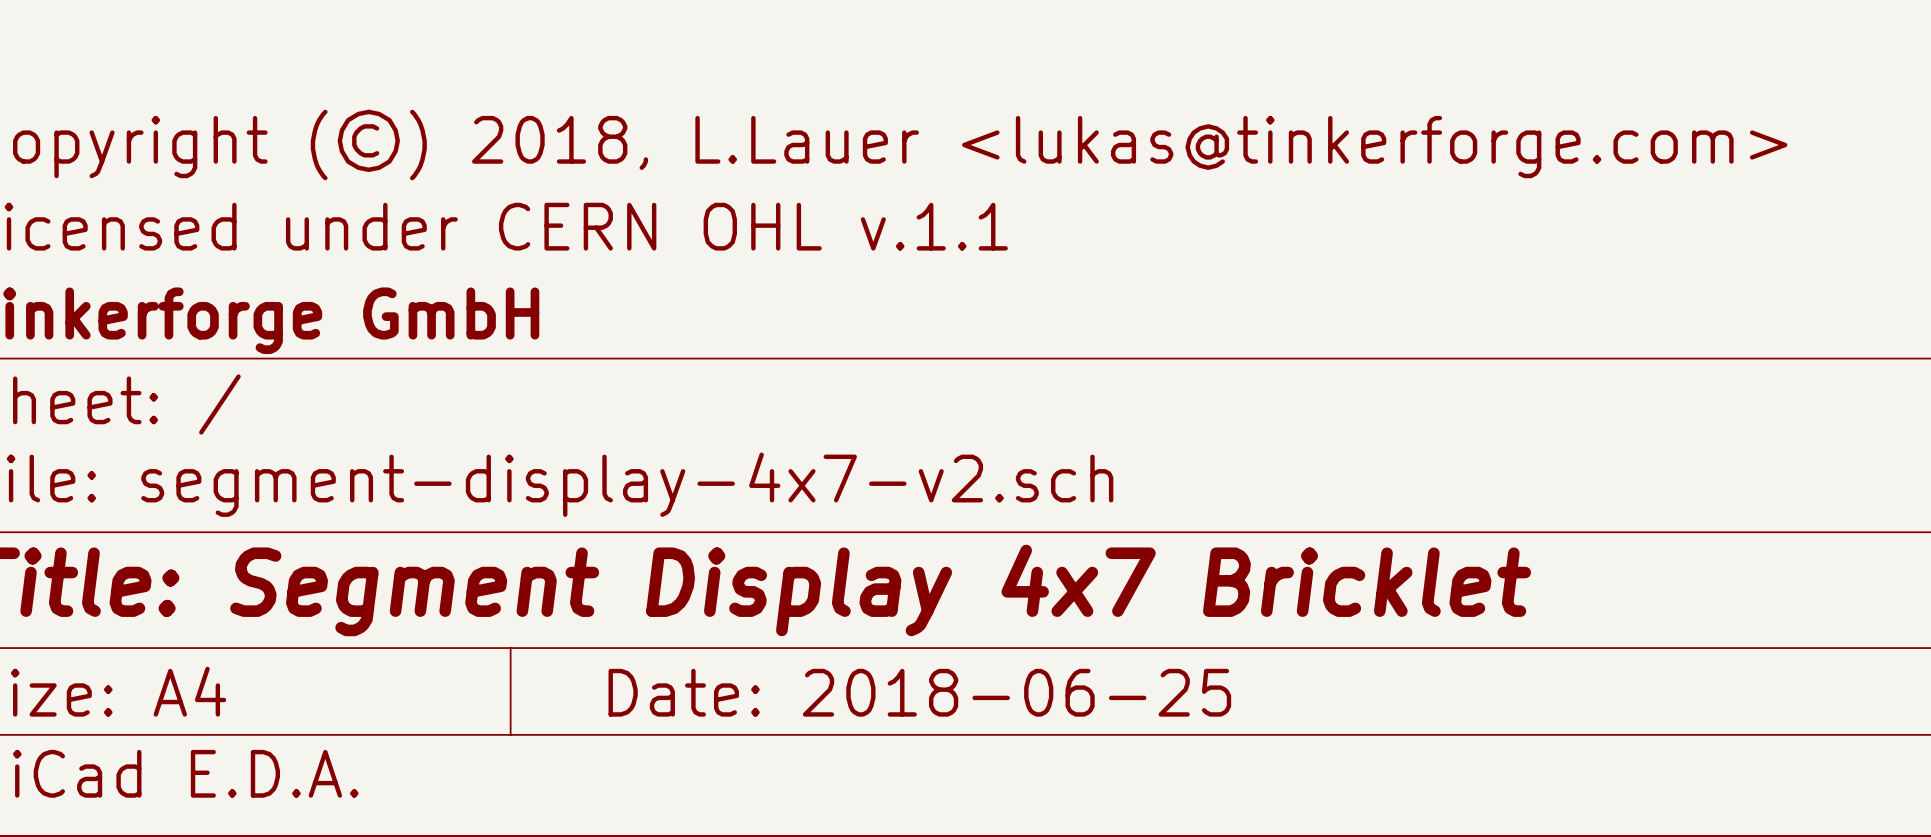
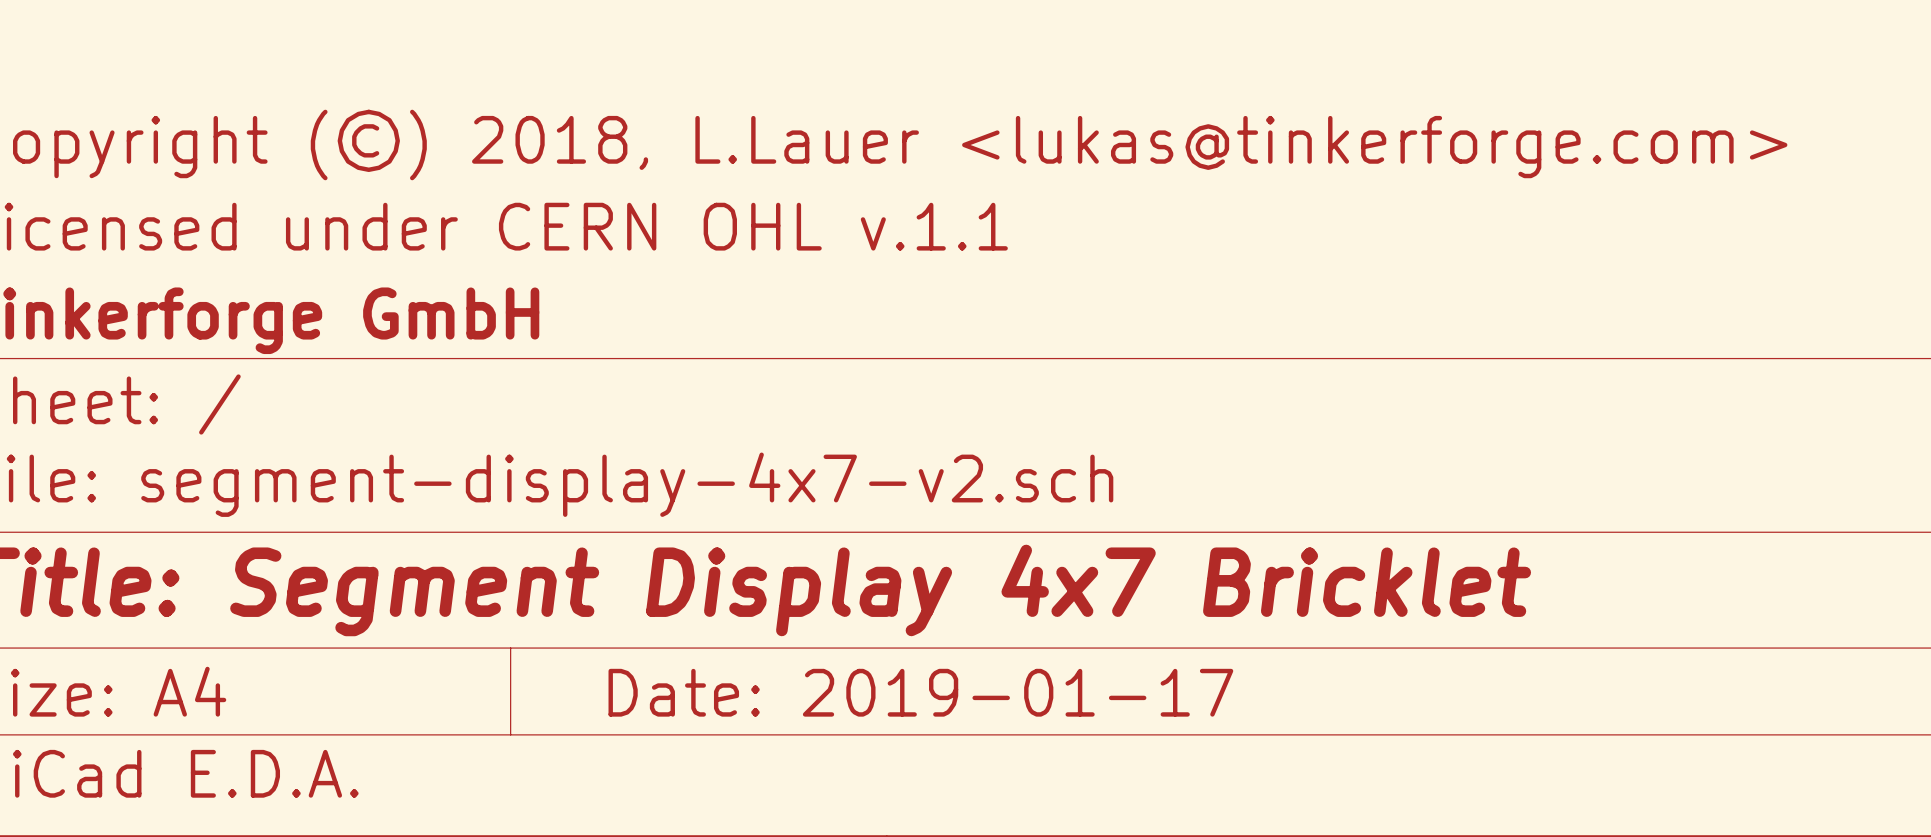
title block: Date: 2018-06-25 (919, 692) -> Date: 2019-01-17 (920, 692)

